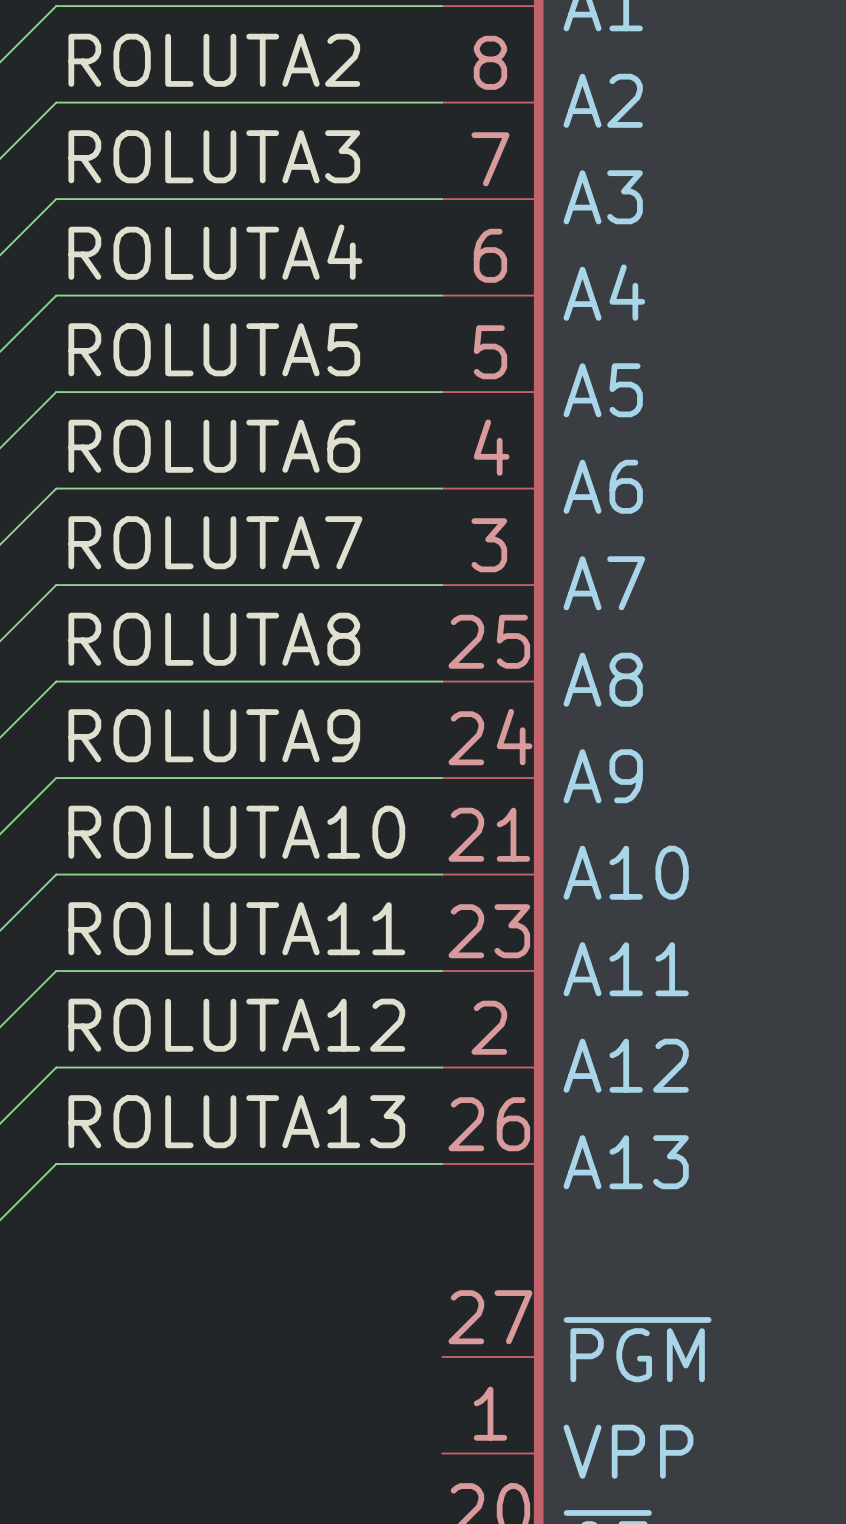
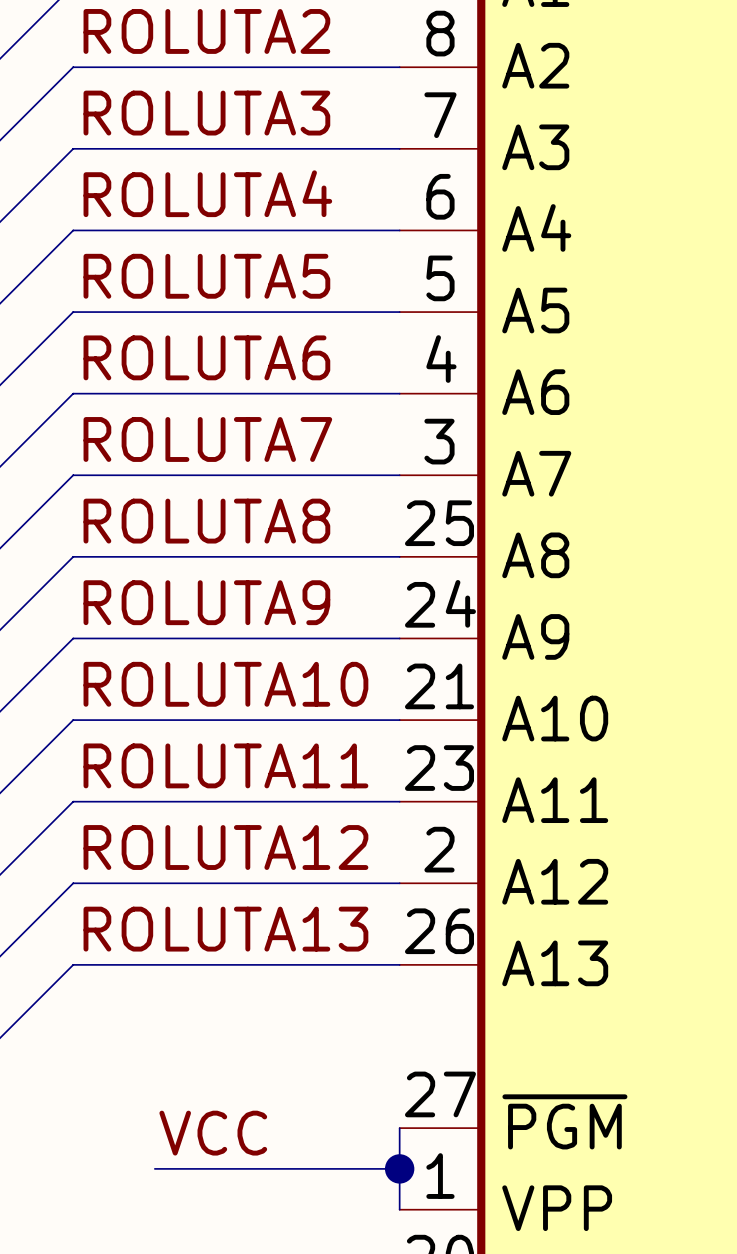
wire: none -> (399, 1128) (399, 1209)
label: none -> VCC (213, 1133)
wire: none -> (154, 1168) (399, 1168)
junction: none -> (399, 1168)

